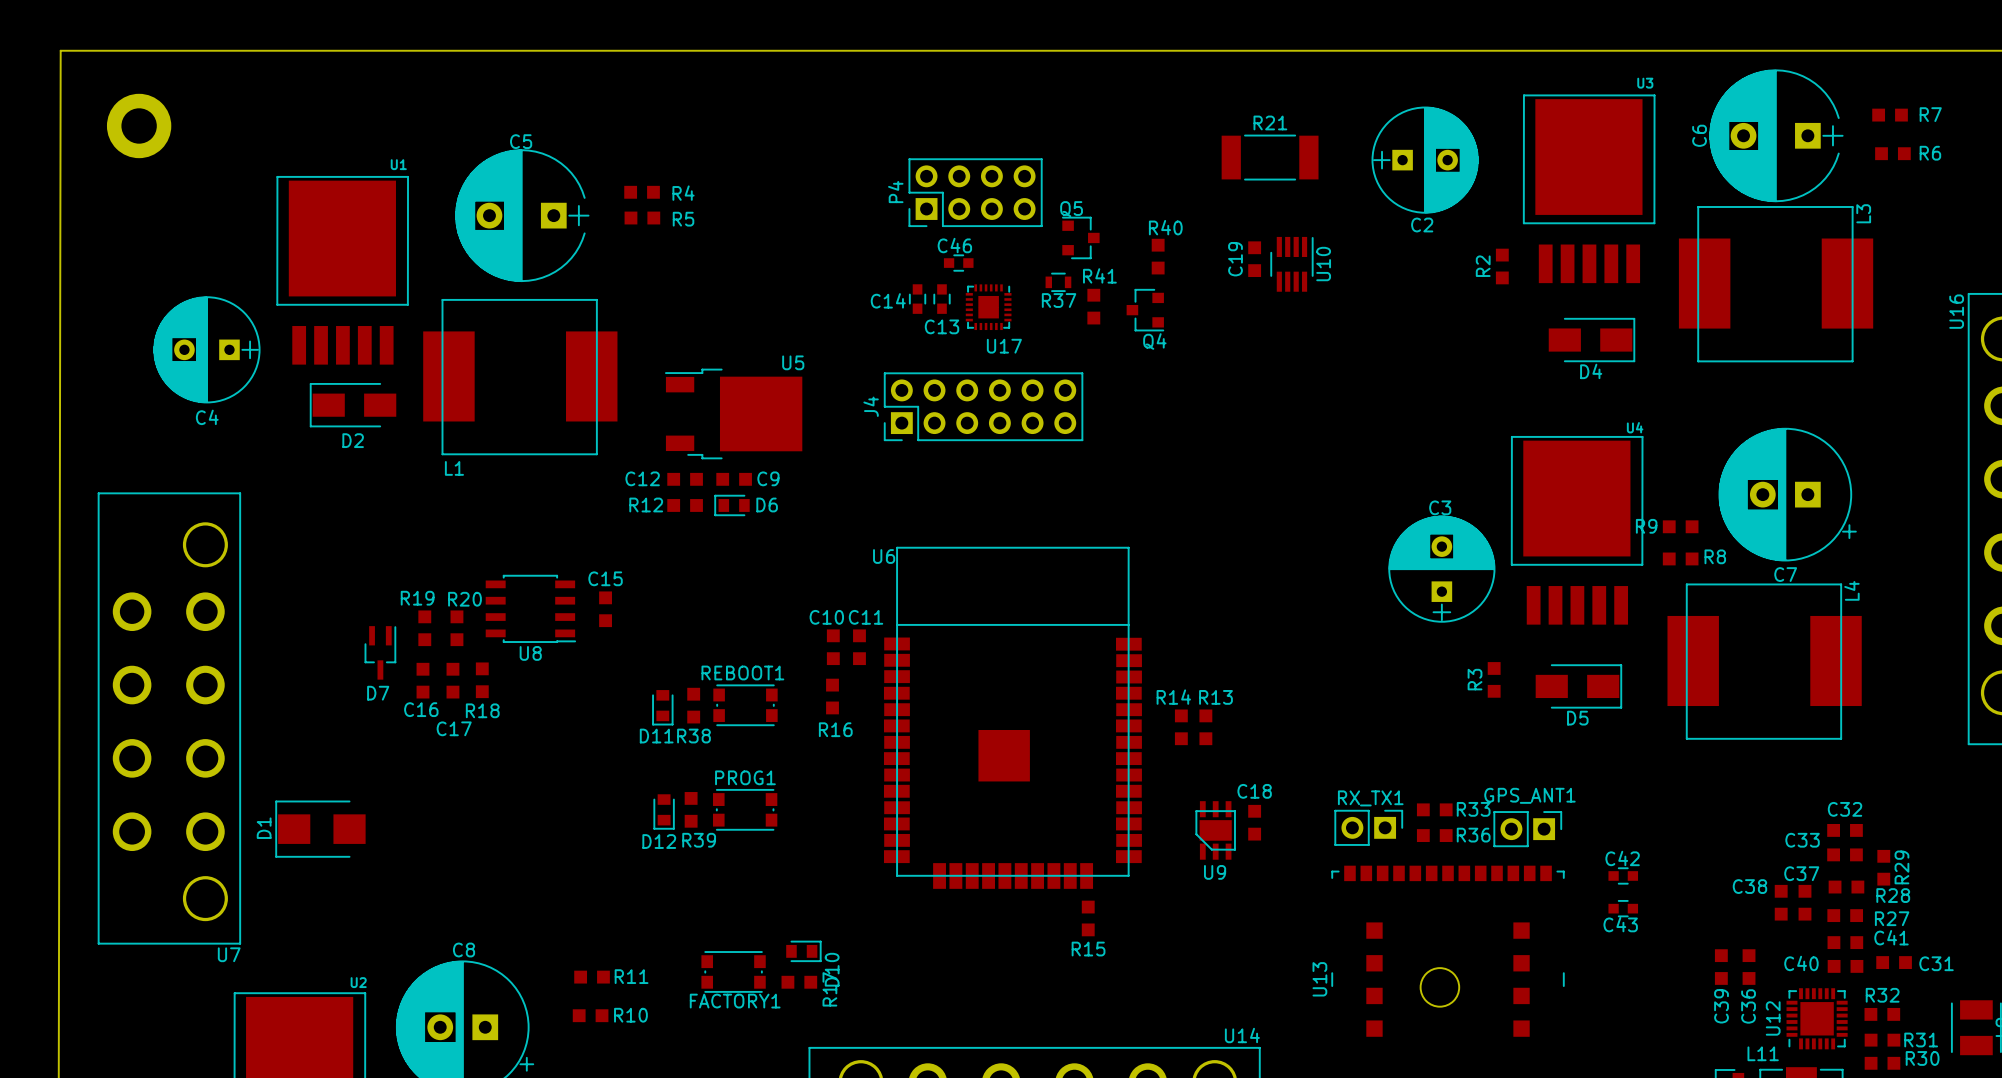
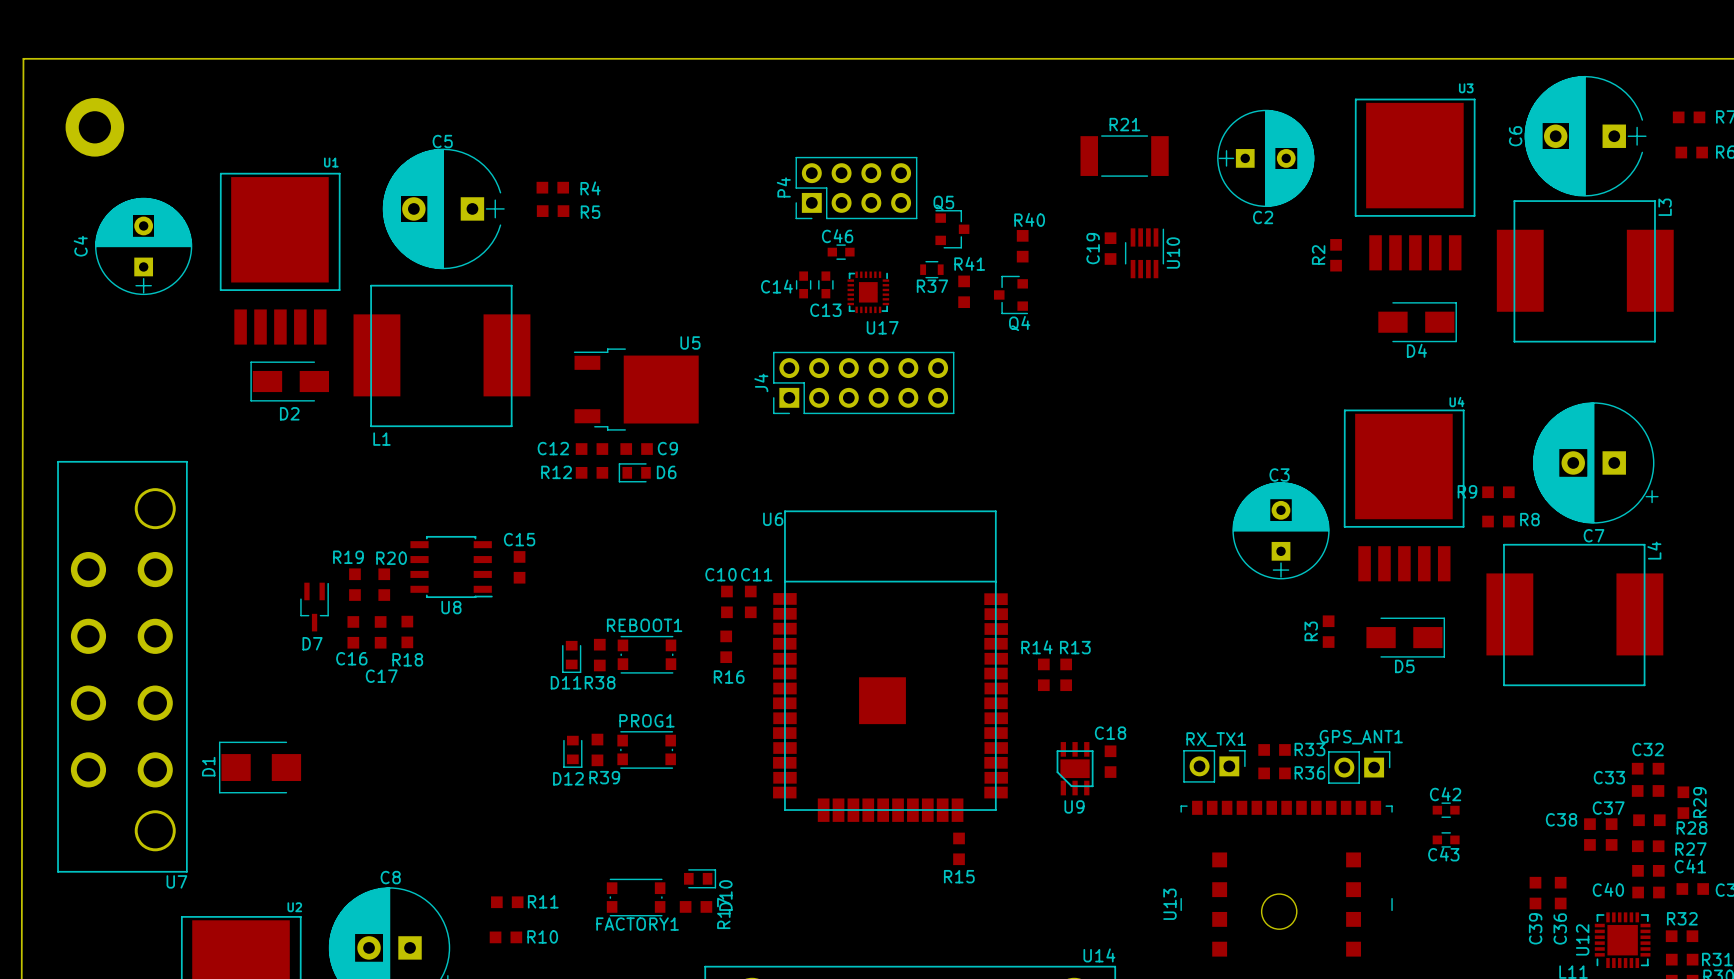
C4 rotation: 0° (206, 349) -> 90° clockwise (143, 246)
C4 position: (206, 349) -> (143, 246)

